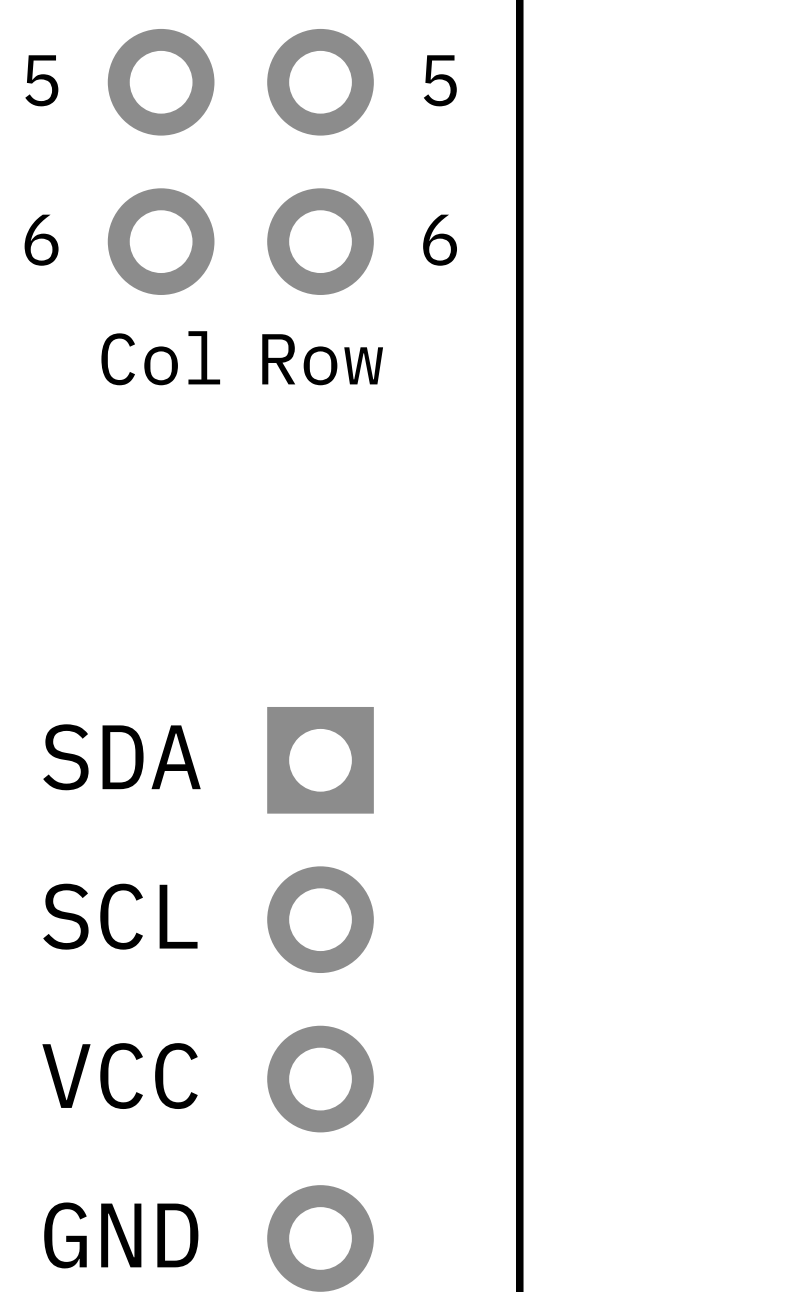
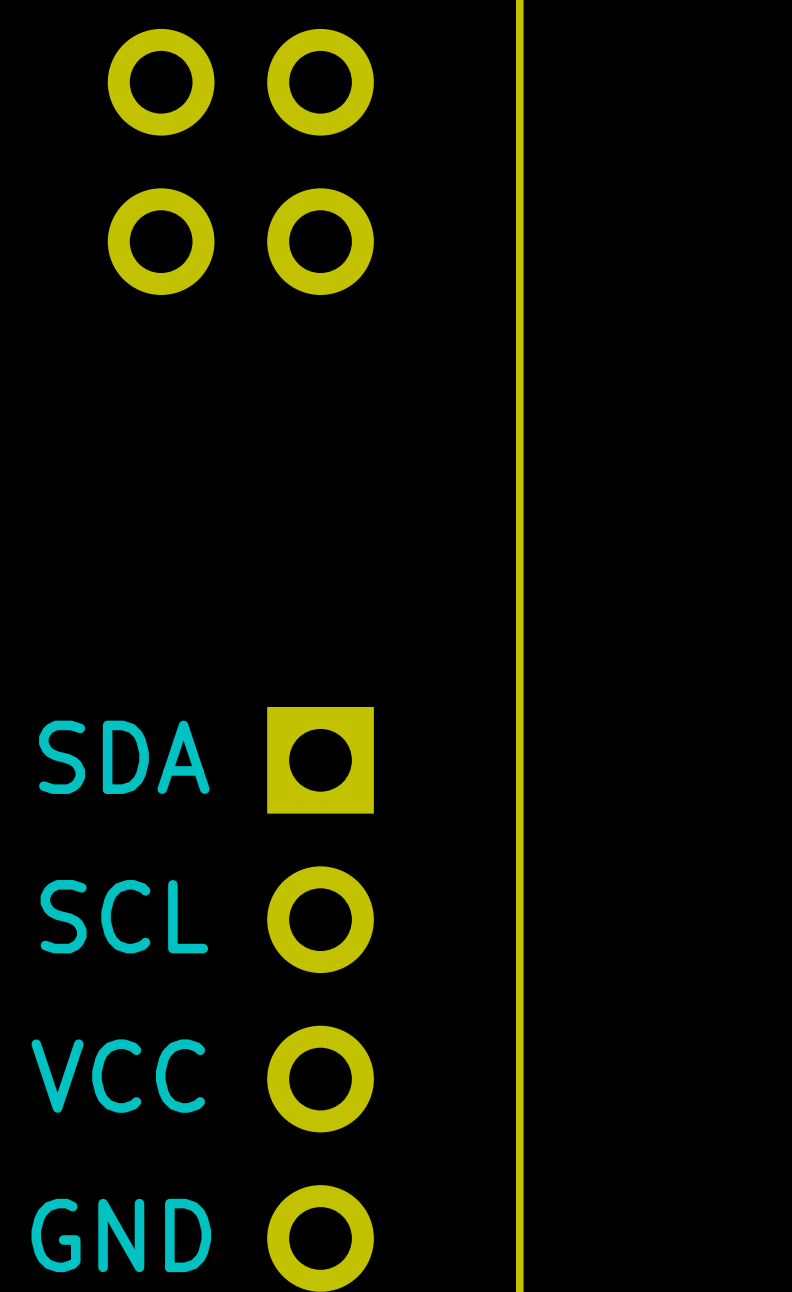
text: 5 (41, 80) -> none
text: 5 (440, 80) -> none
text: 6 (41, 240) -> none
text: 6 (440, 240) -> none
text: Col (160, 358) -> none
text: Row (322, 359) -> none

